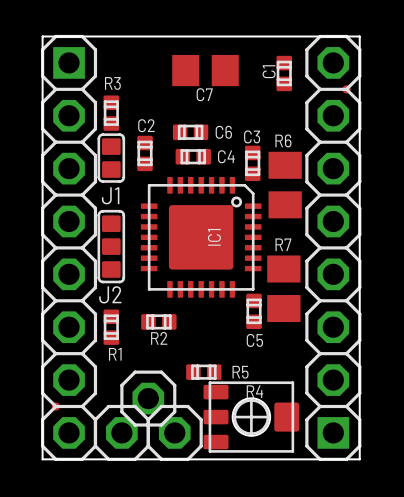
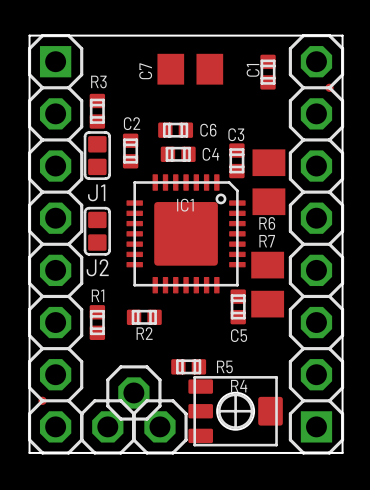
C7 name rotation: 0° (204, 94) -> 90° counterclockwise (145, 71)
C7 name position: C7 (204, 94) -> C7 (145, 71)
R6 name position: R6 (283, 140) -> R6 (267, 223)
J2 footprint: [97, 209, 126, 284] -> [83, 206, 111, 256]
IC1 name rotation: 0° (214, 237) -> 90° clockwise (185, 205)
R1 name position: R1 (115, 354) -> R1 (98, 295)

